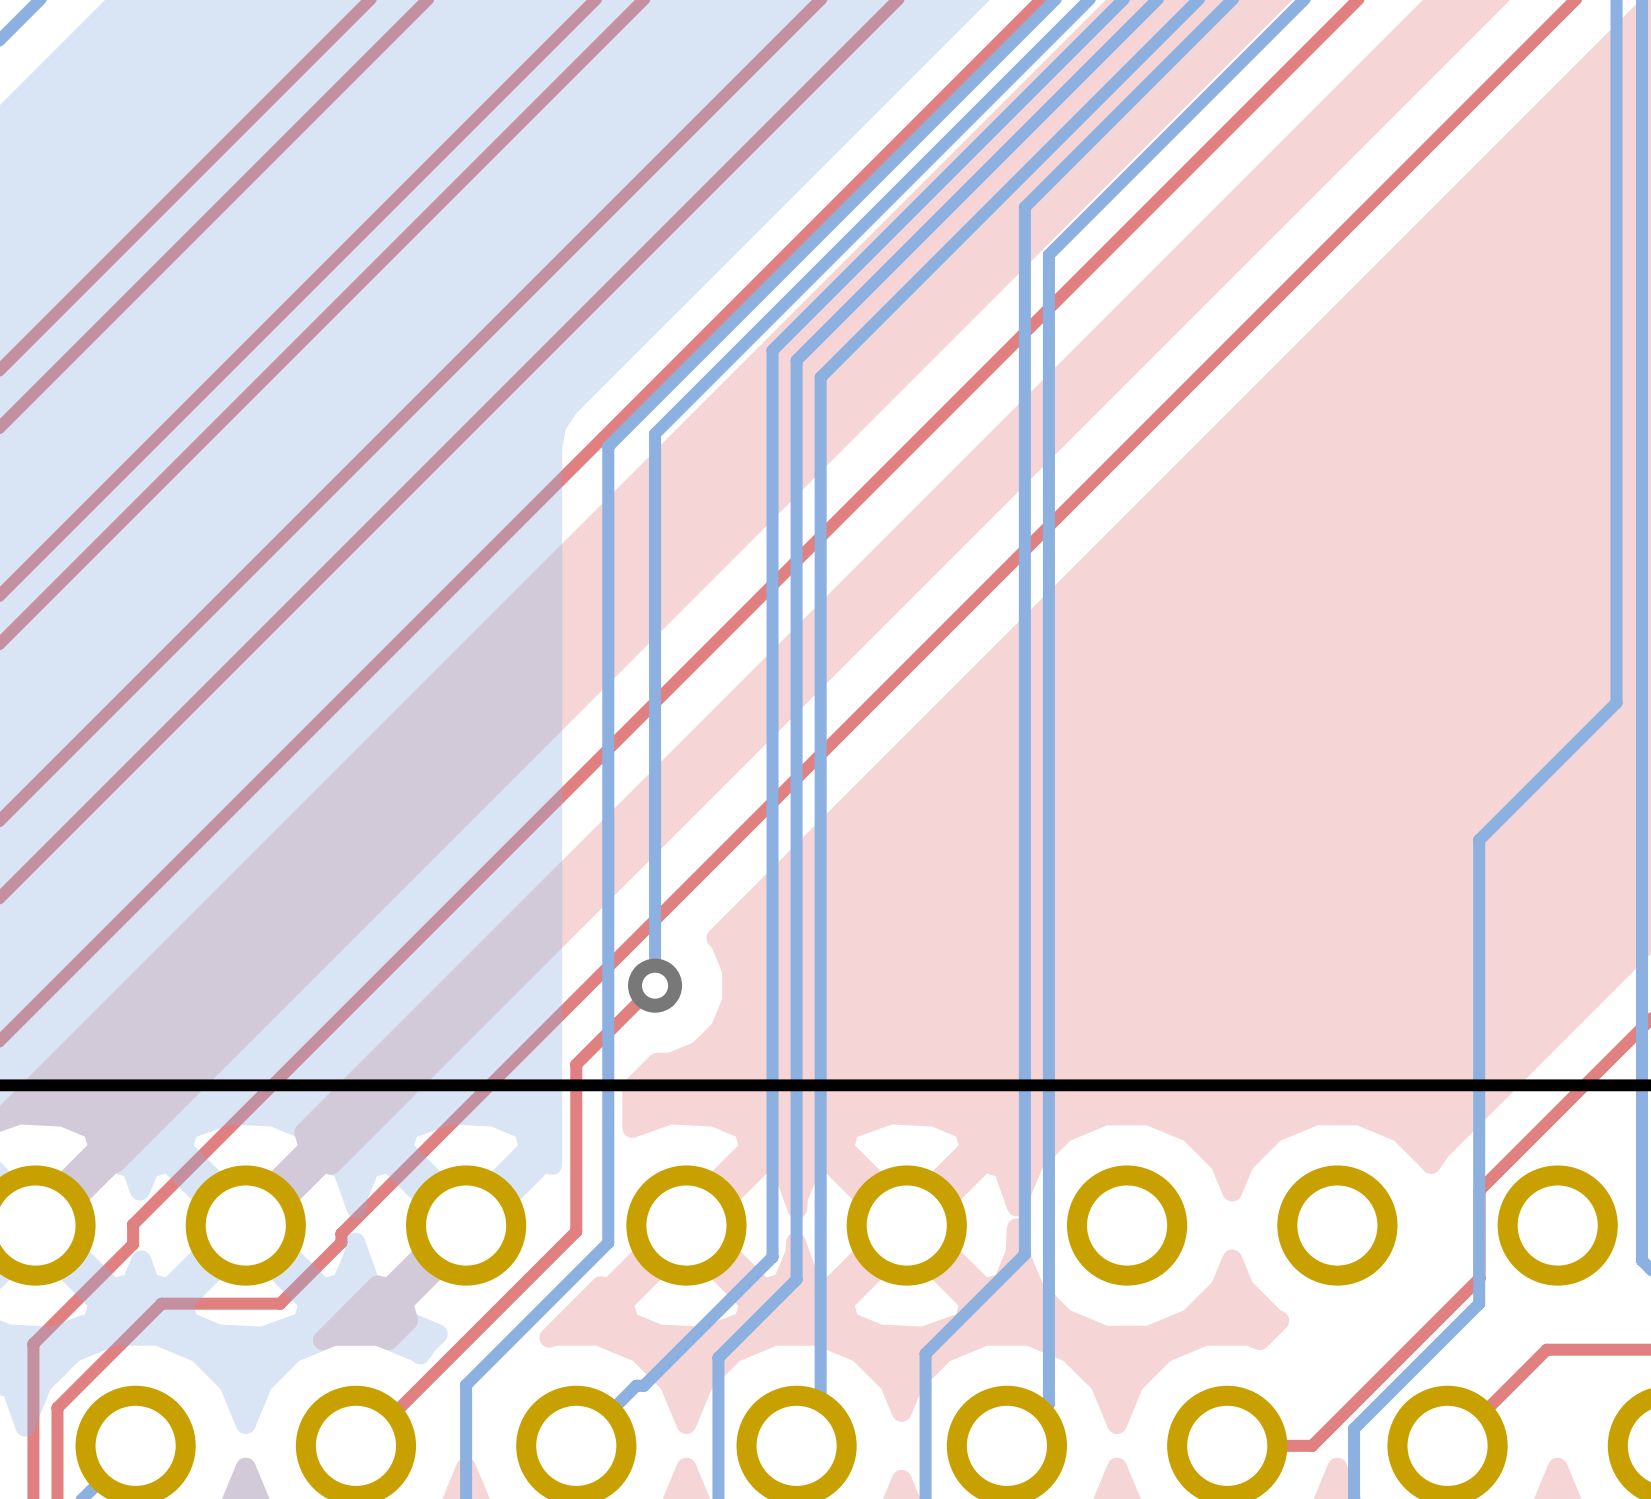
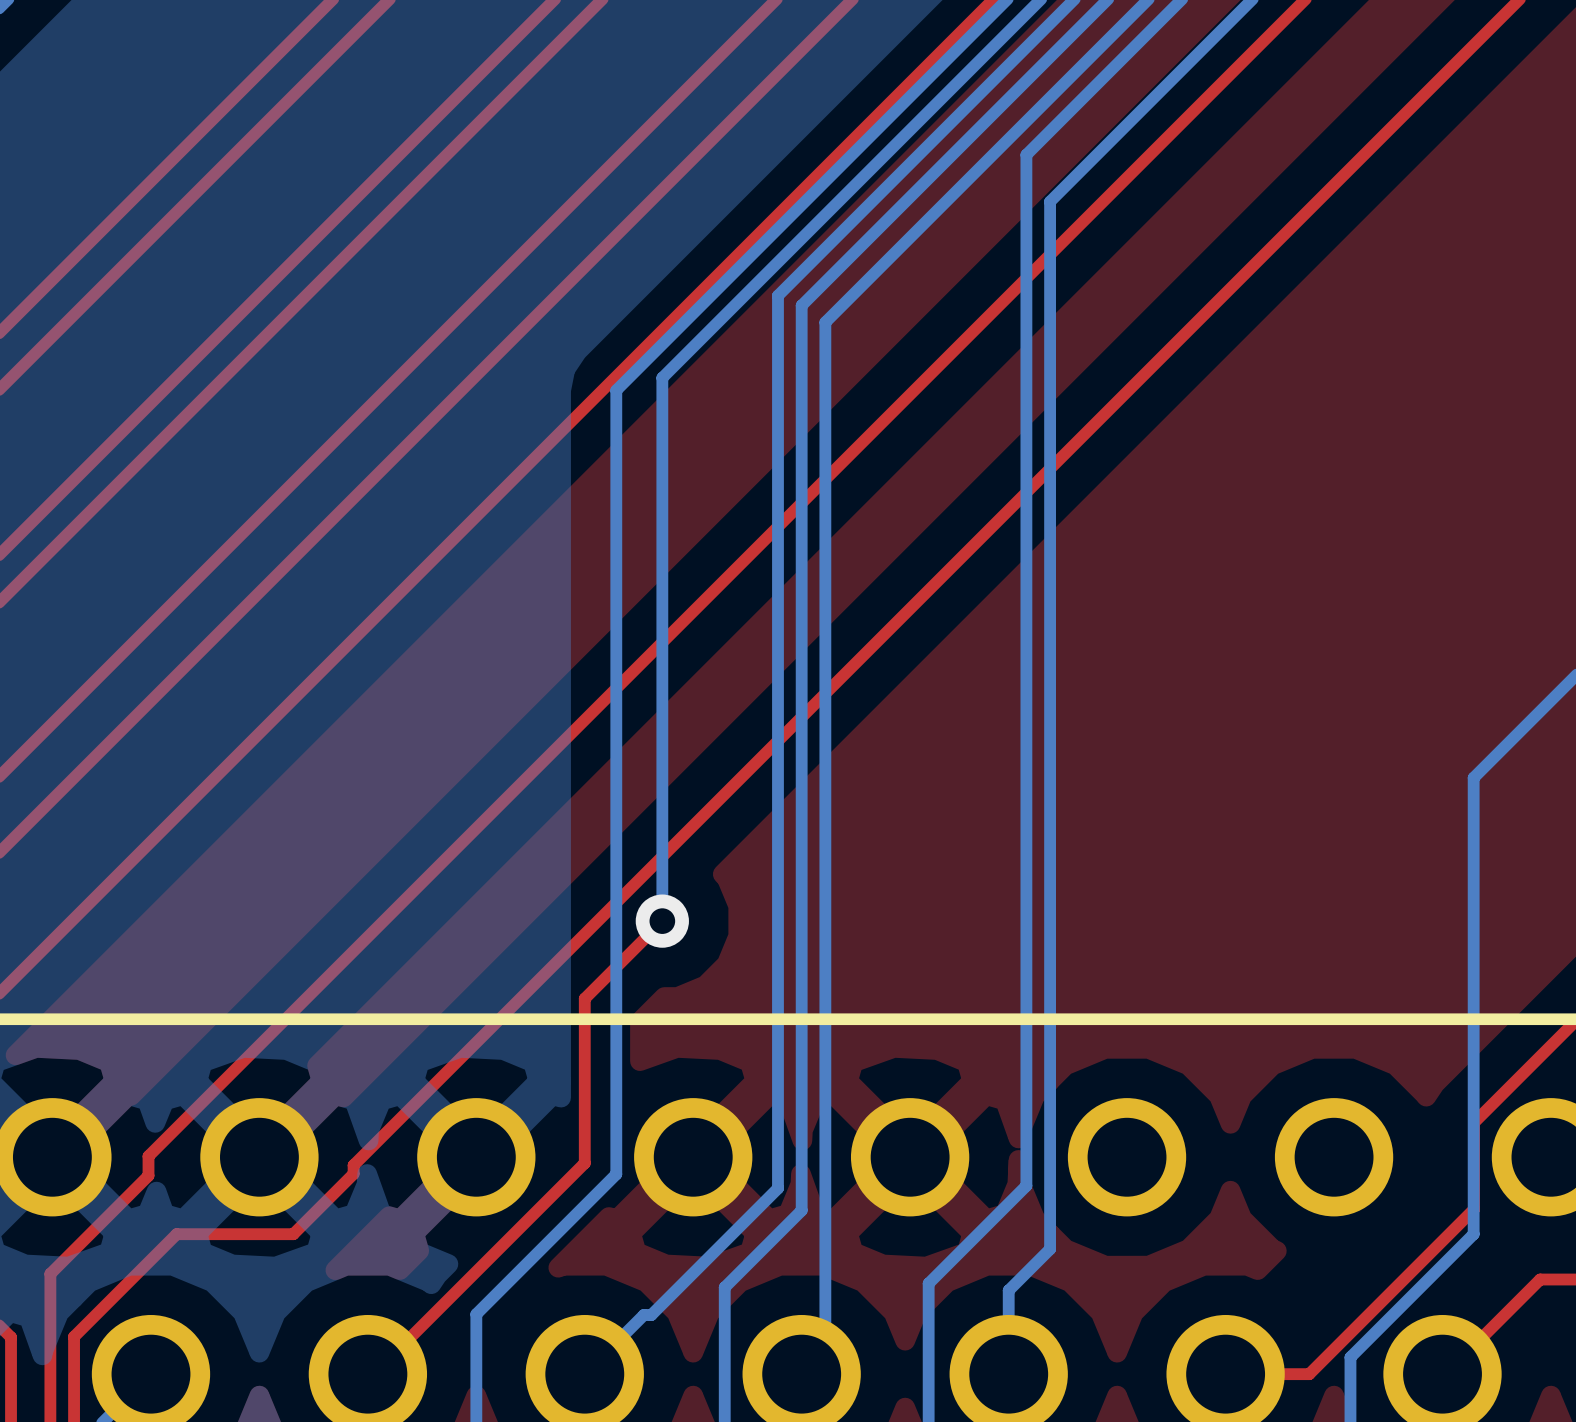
bottom track: (1048, 1318) (1048, 1403) (1006, 1445) -> (1050, 1249) (1008, 1290) (1008, 1374)

